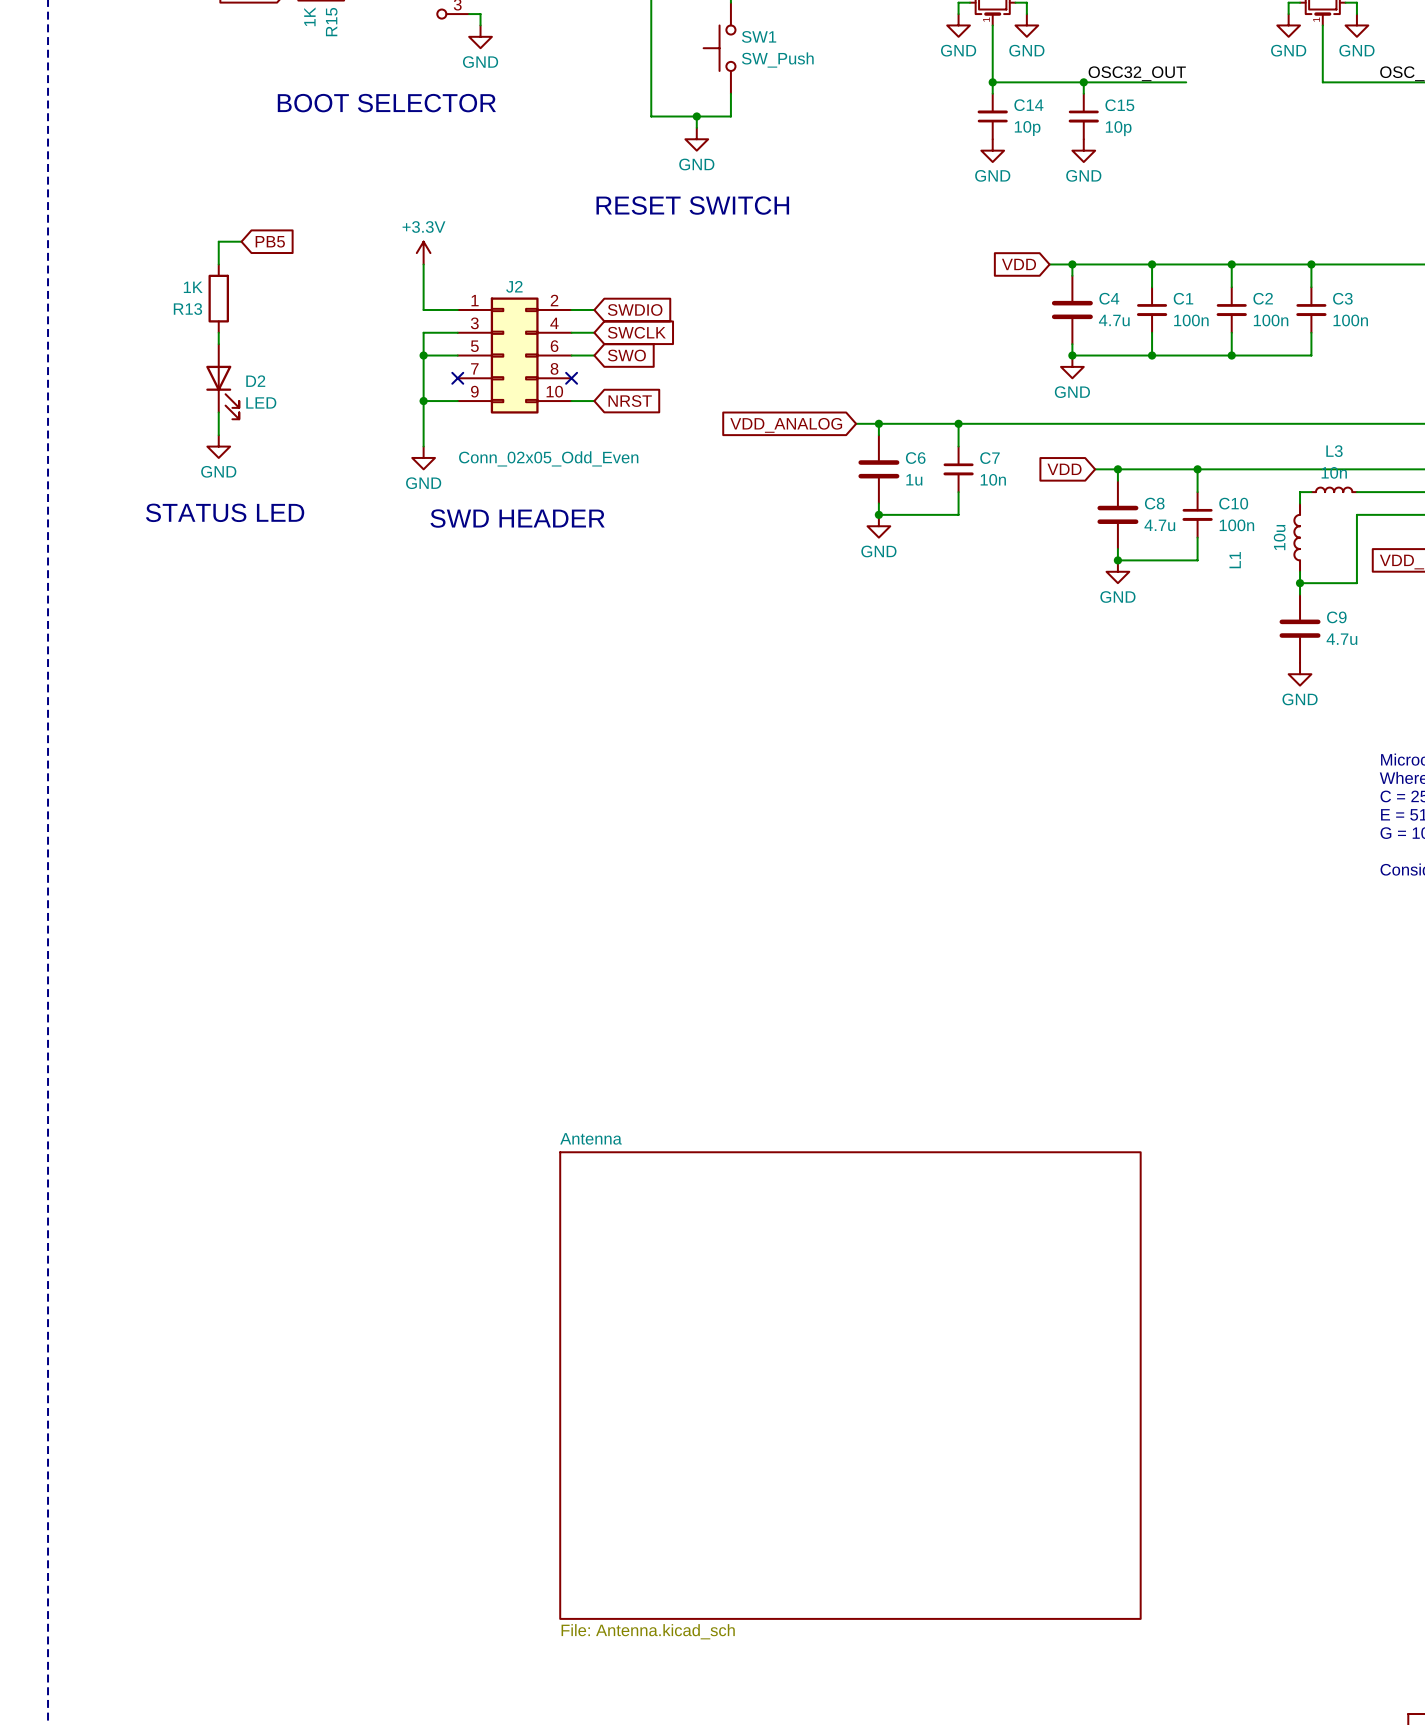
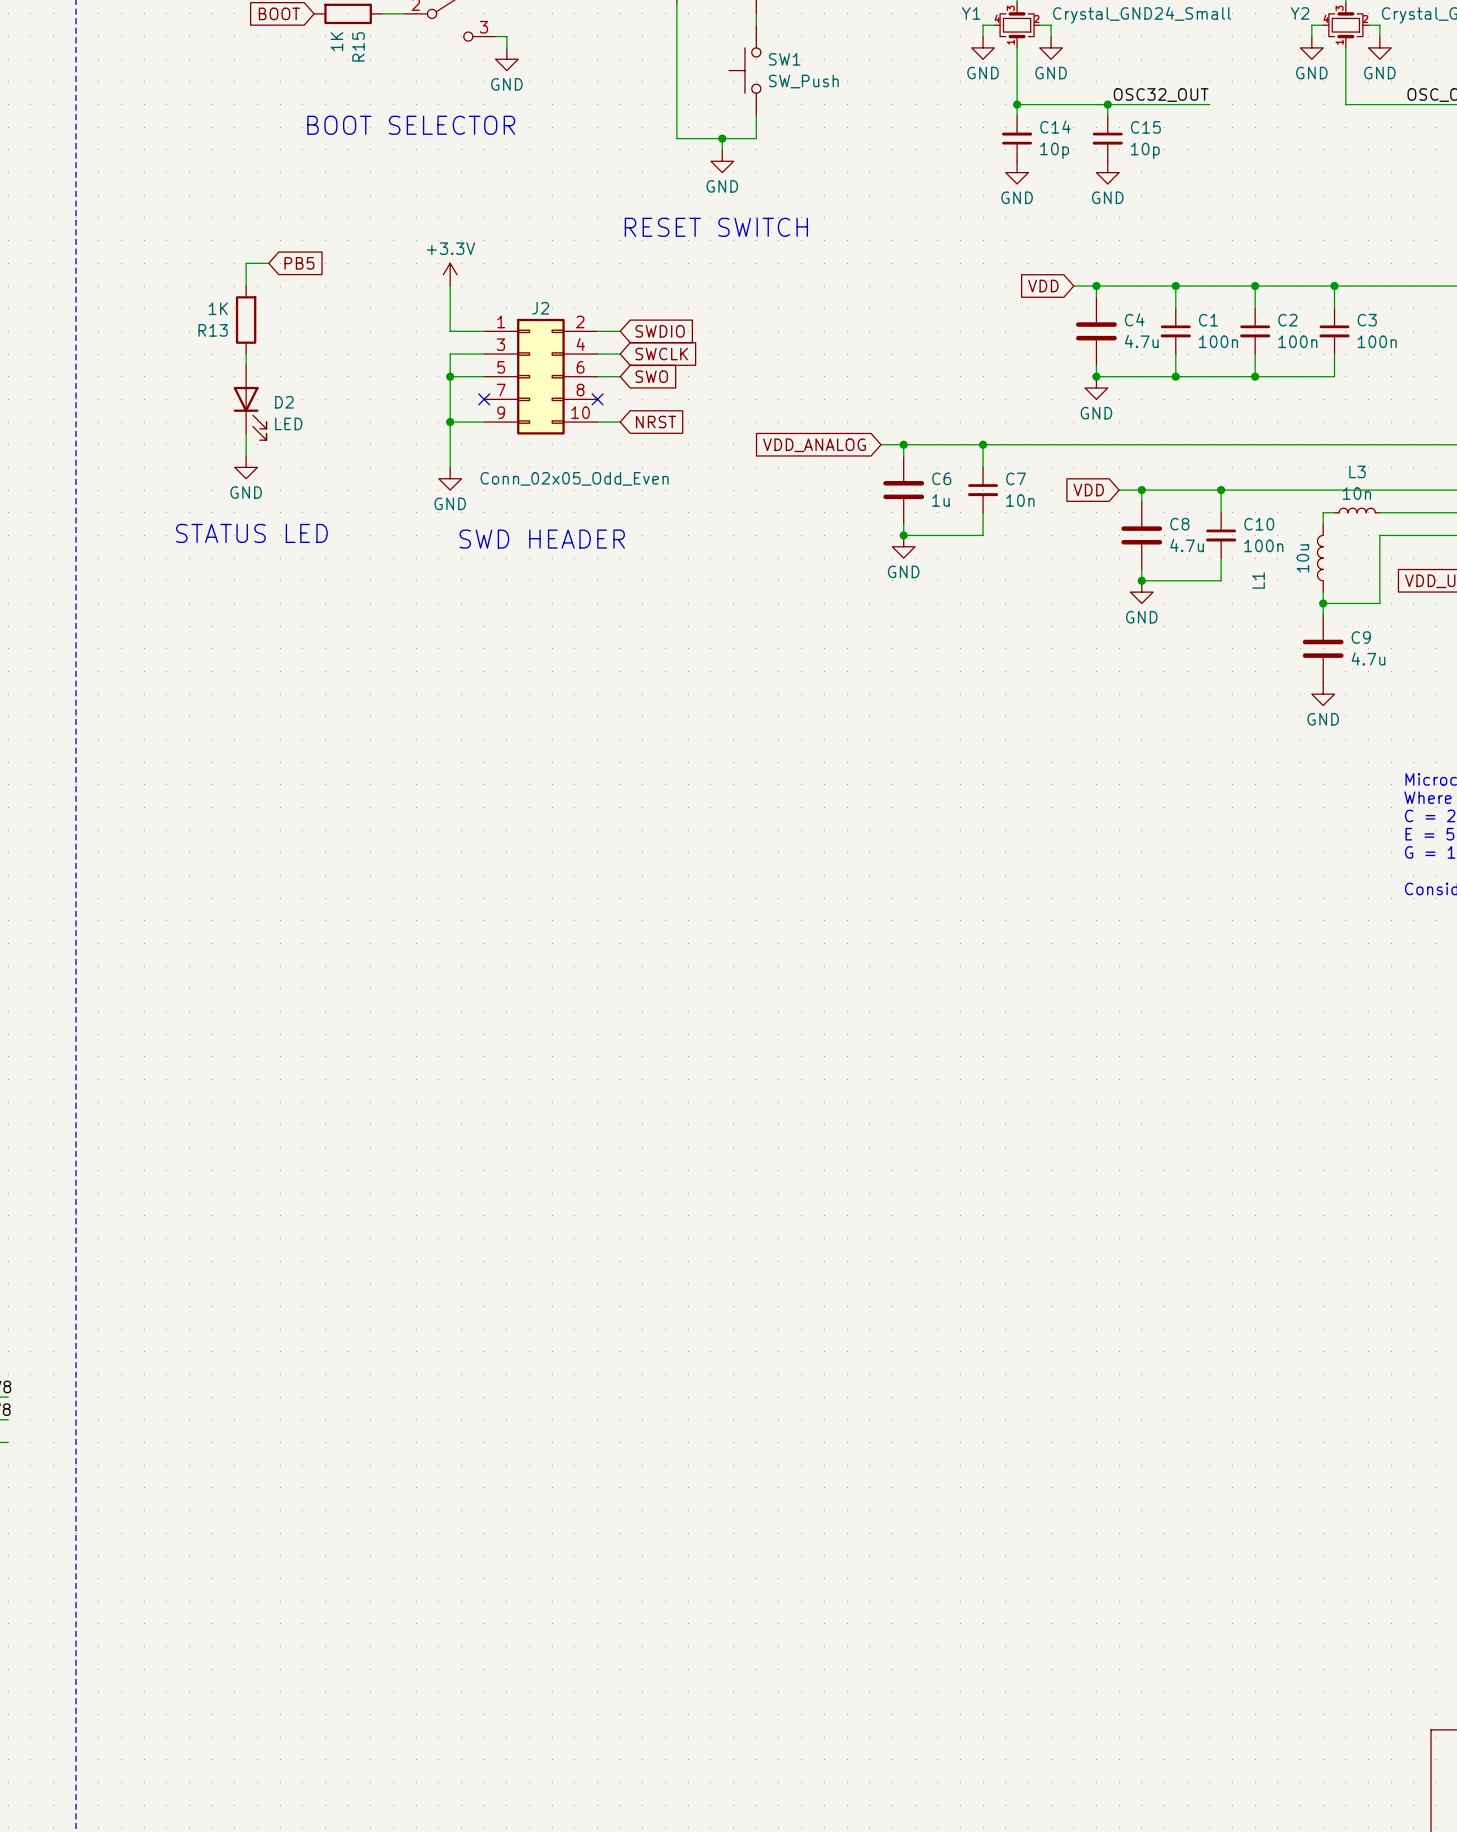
sheet Antenna: File: Antenna.kicad_sch (850, 1385) -> none

